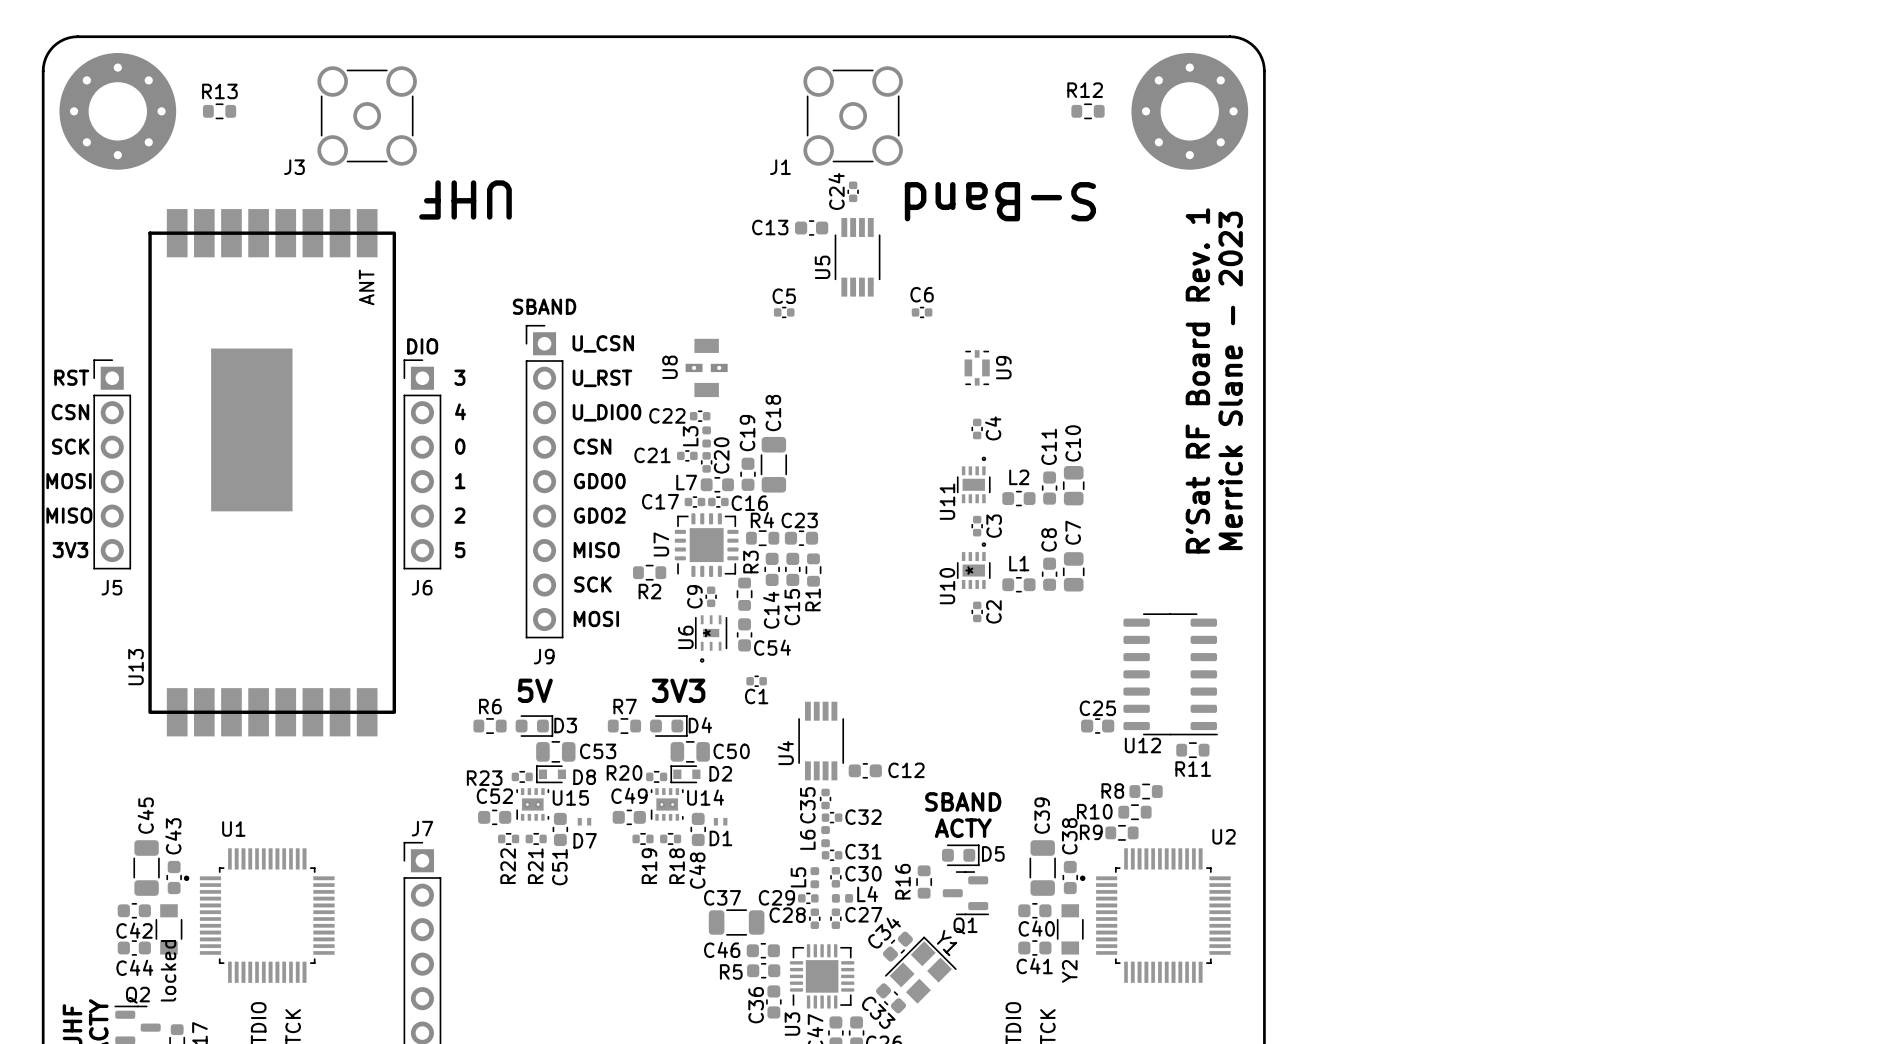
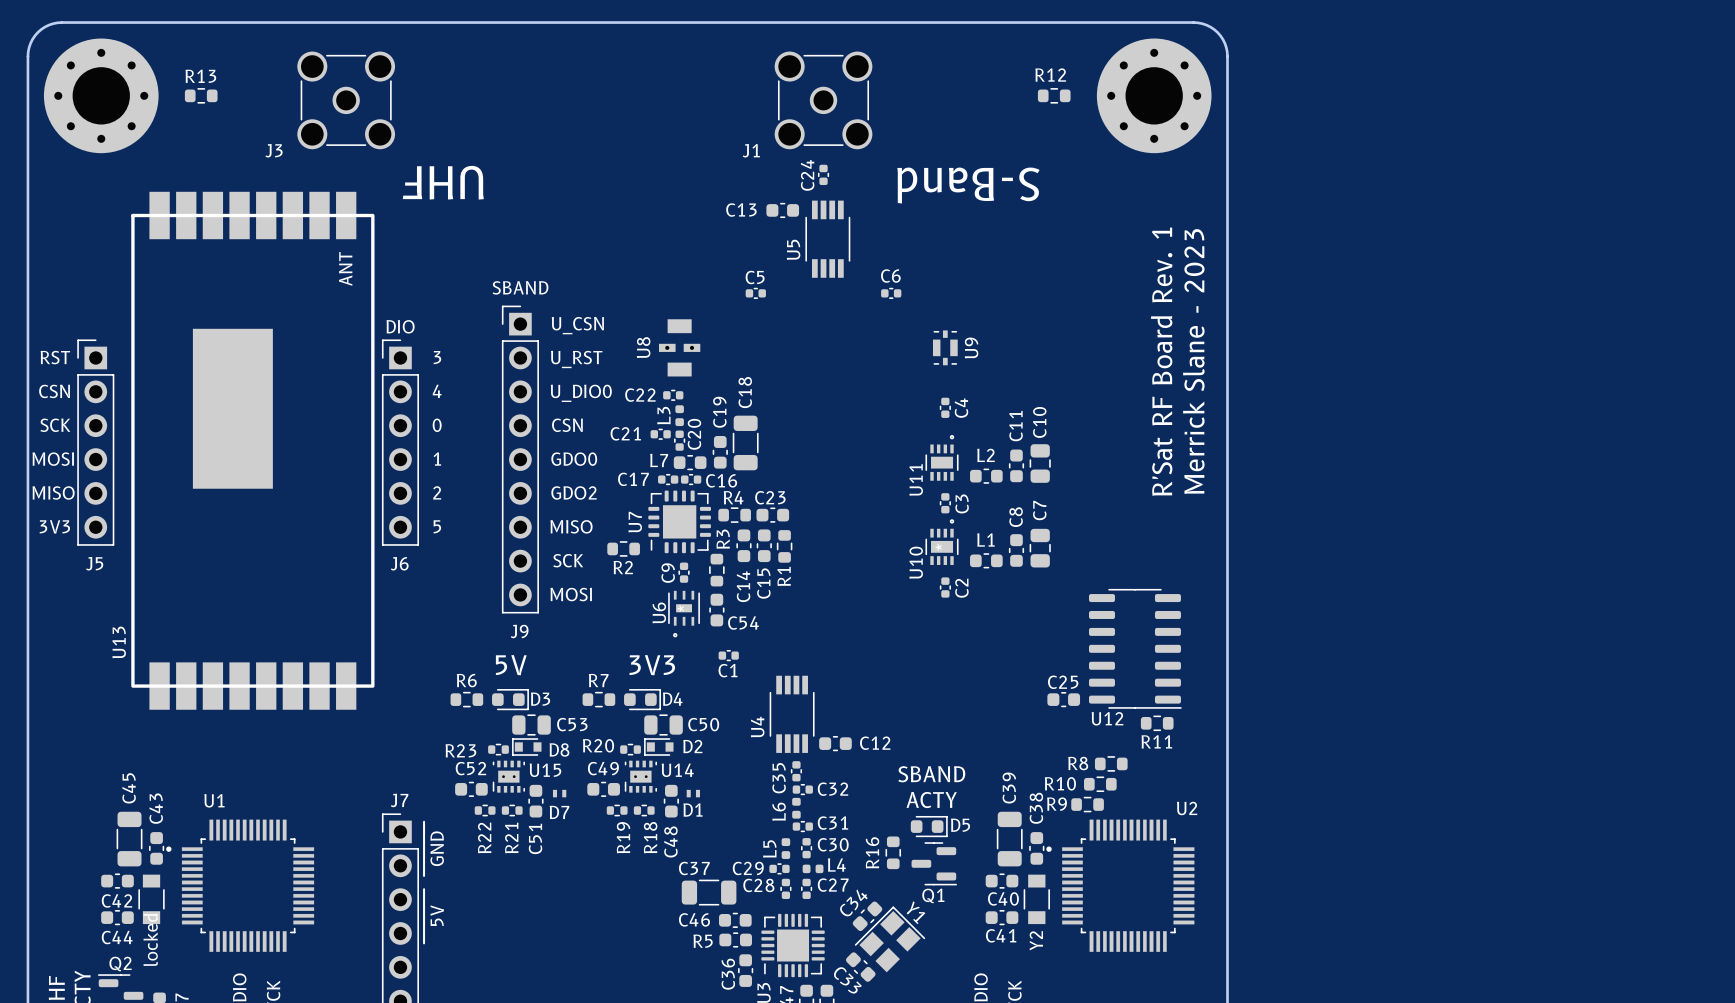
line: none -> (424, 821) (424, 875)
text: none -> GND (437, 848)
line: none -> (424, 889) (424, 943)
text: none -> 5V (437, 915)

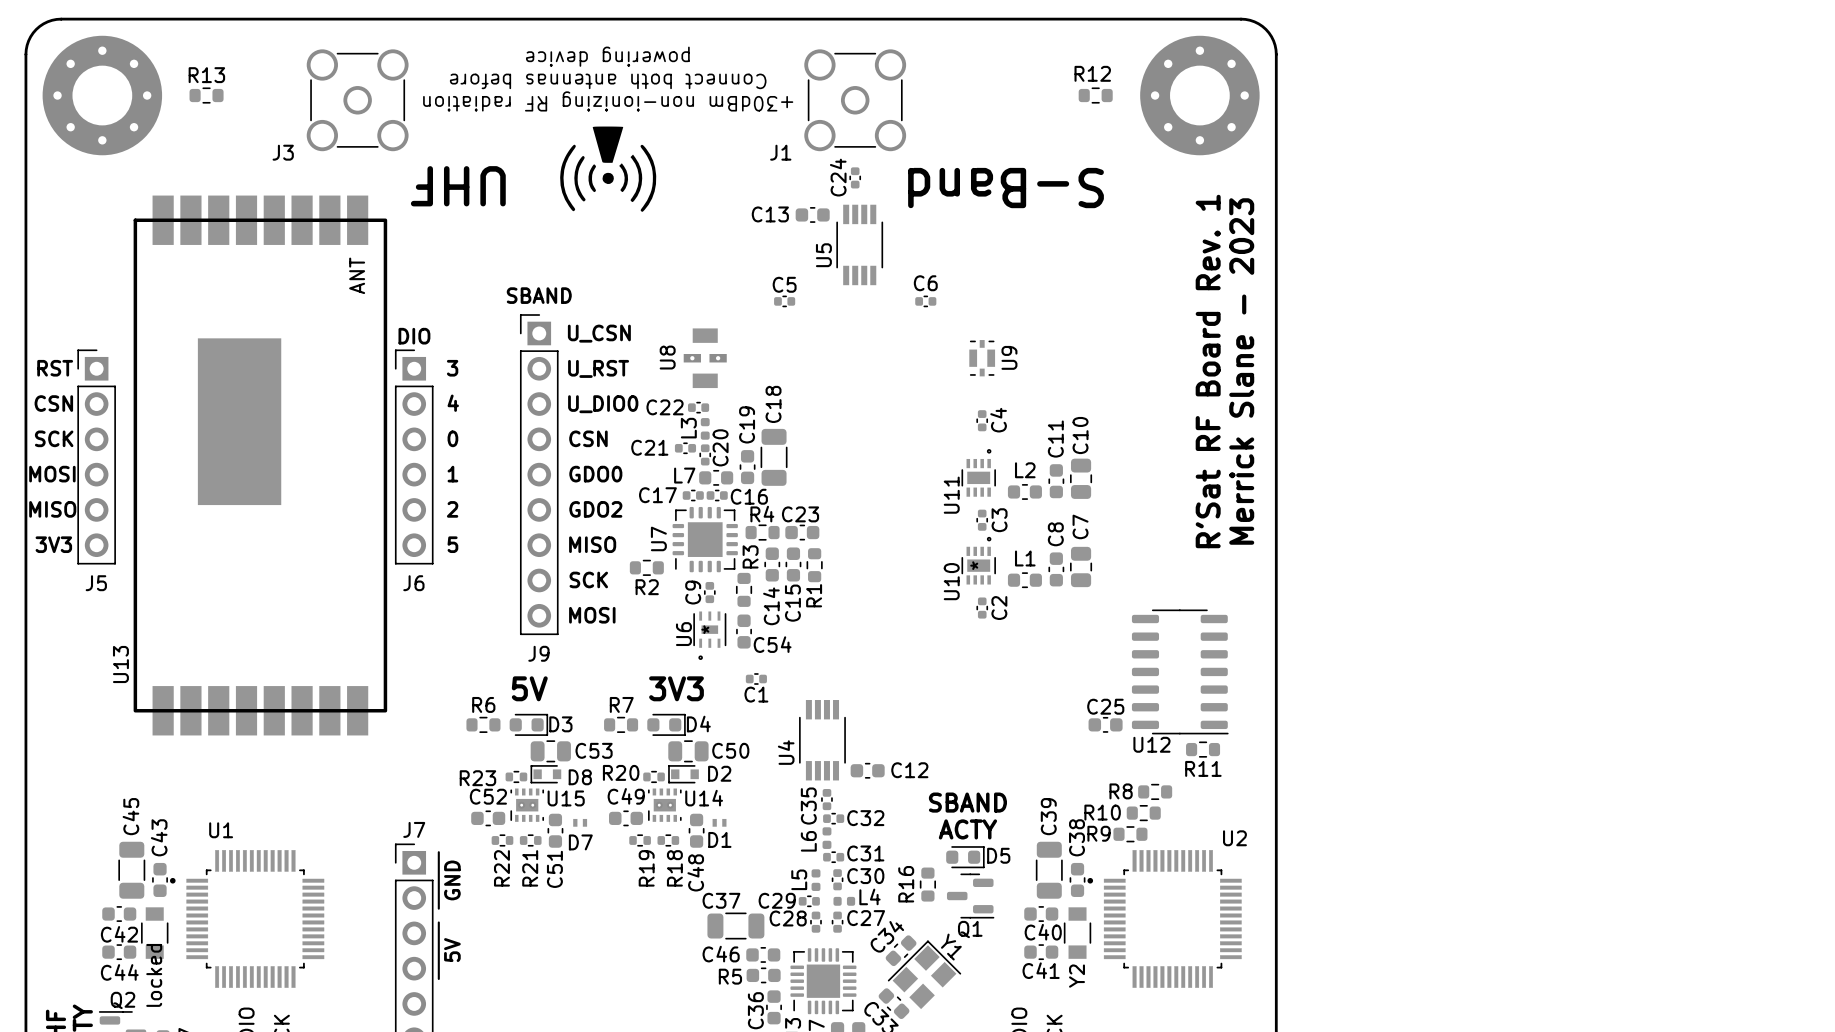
text: none -> powering device (607, 56)
text: none -> Connect both antennas before (608, 81)
text: none -> +30dBm non-ionizing RF radiation (608, 101)
drawing: none -> [560, 126, 657, 212]

